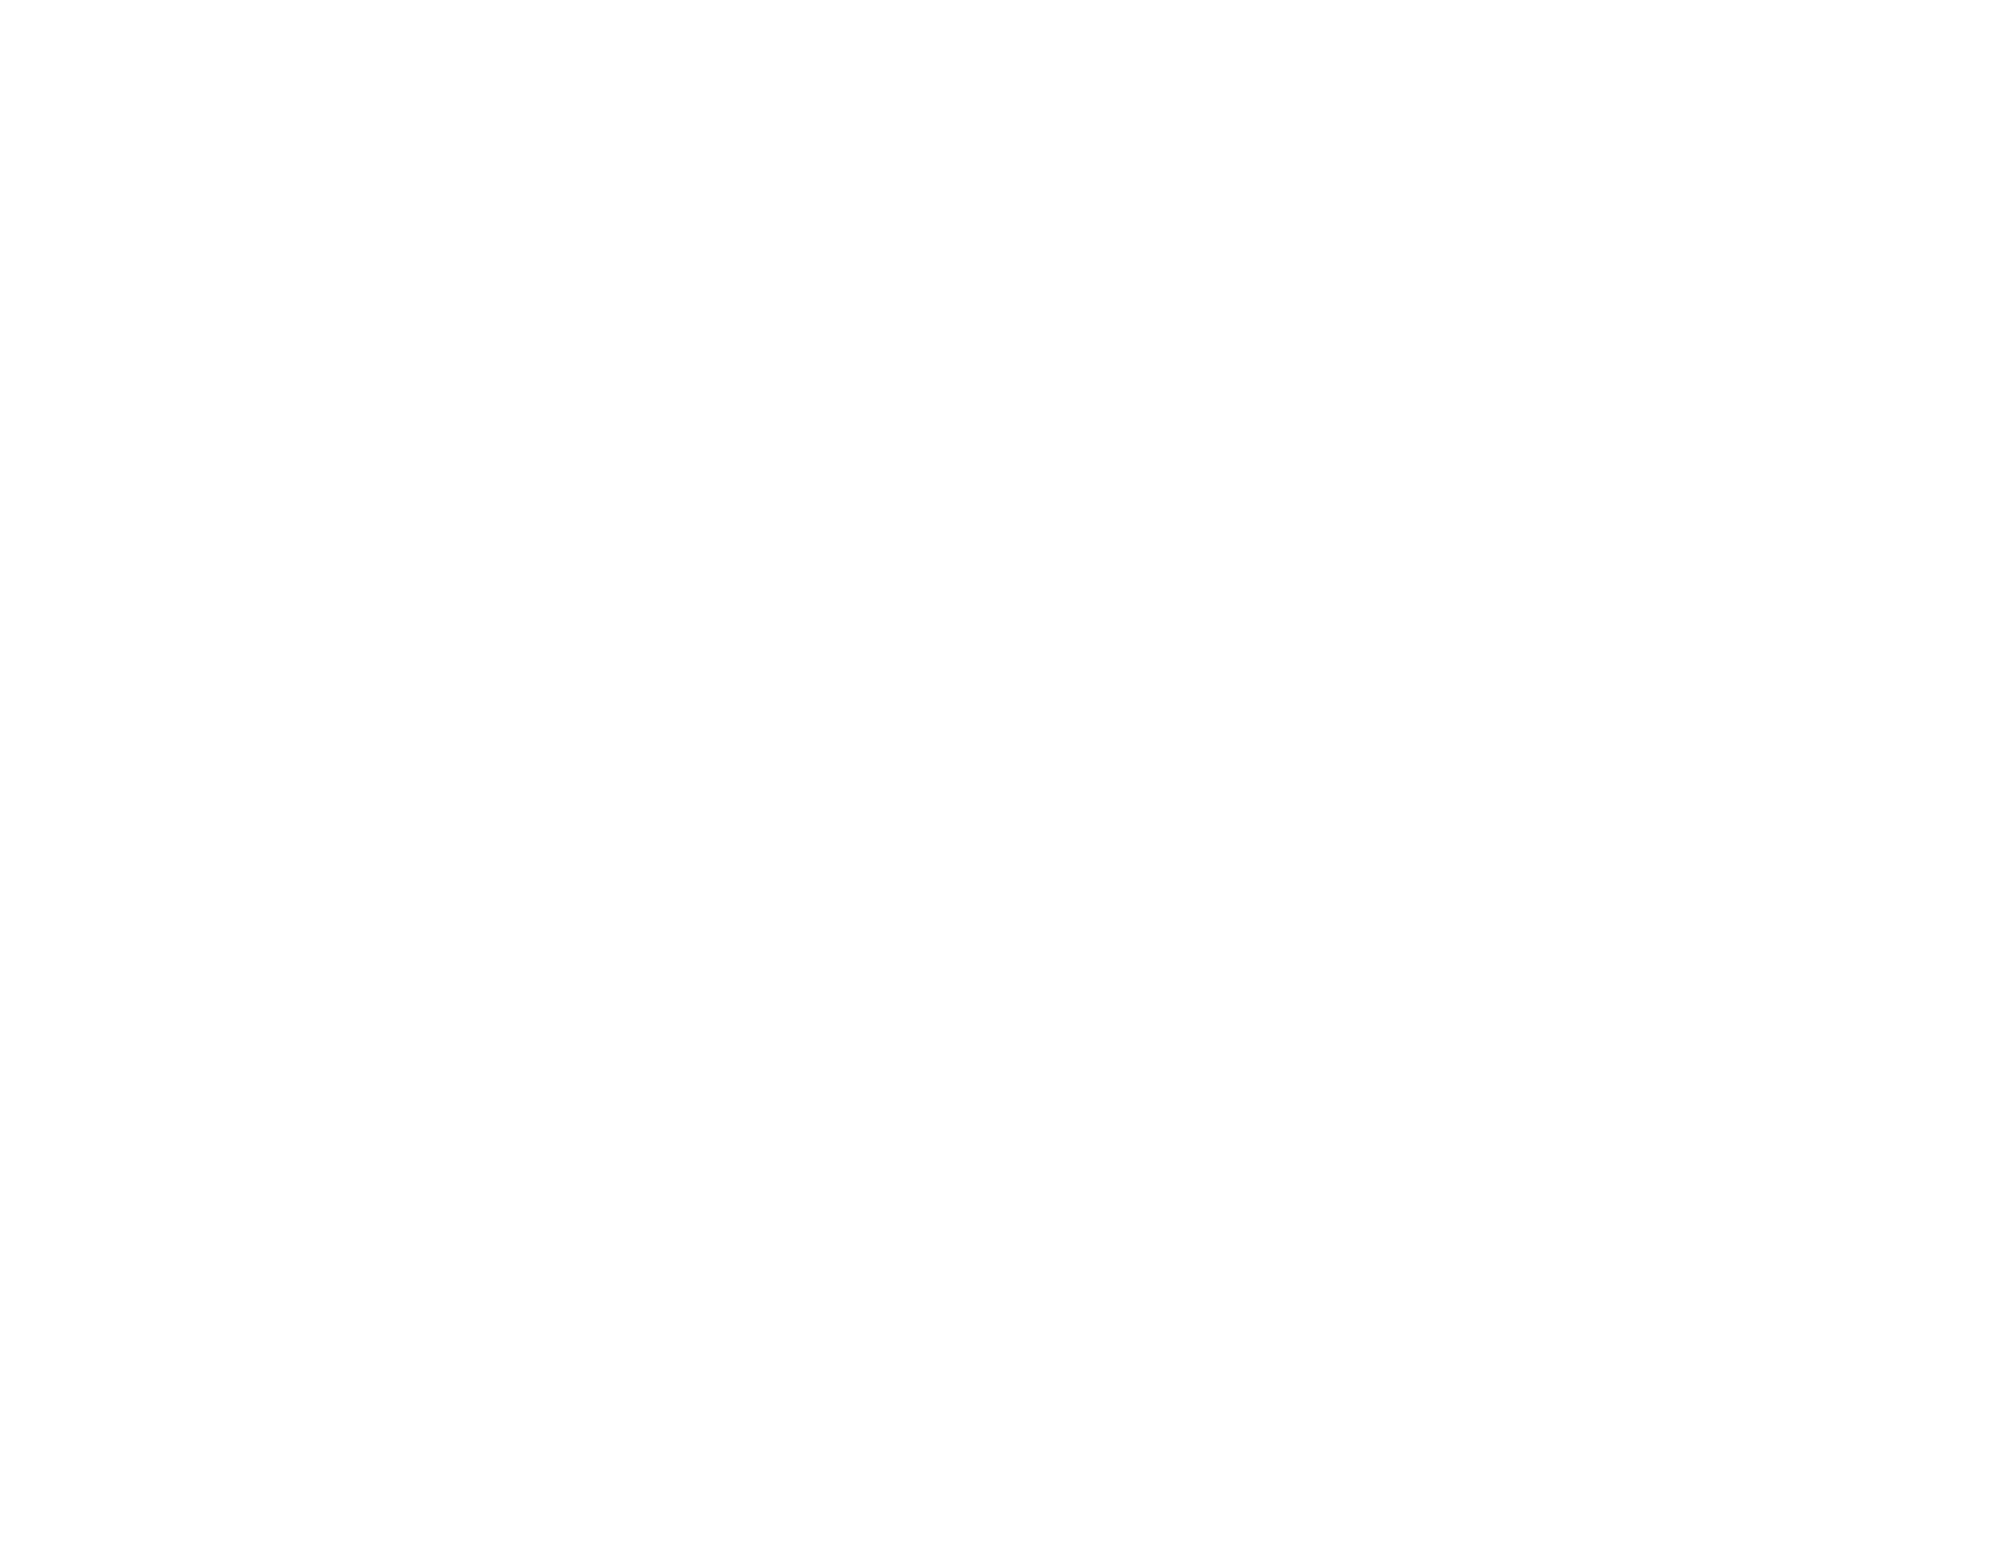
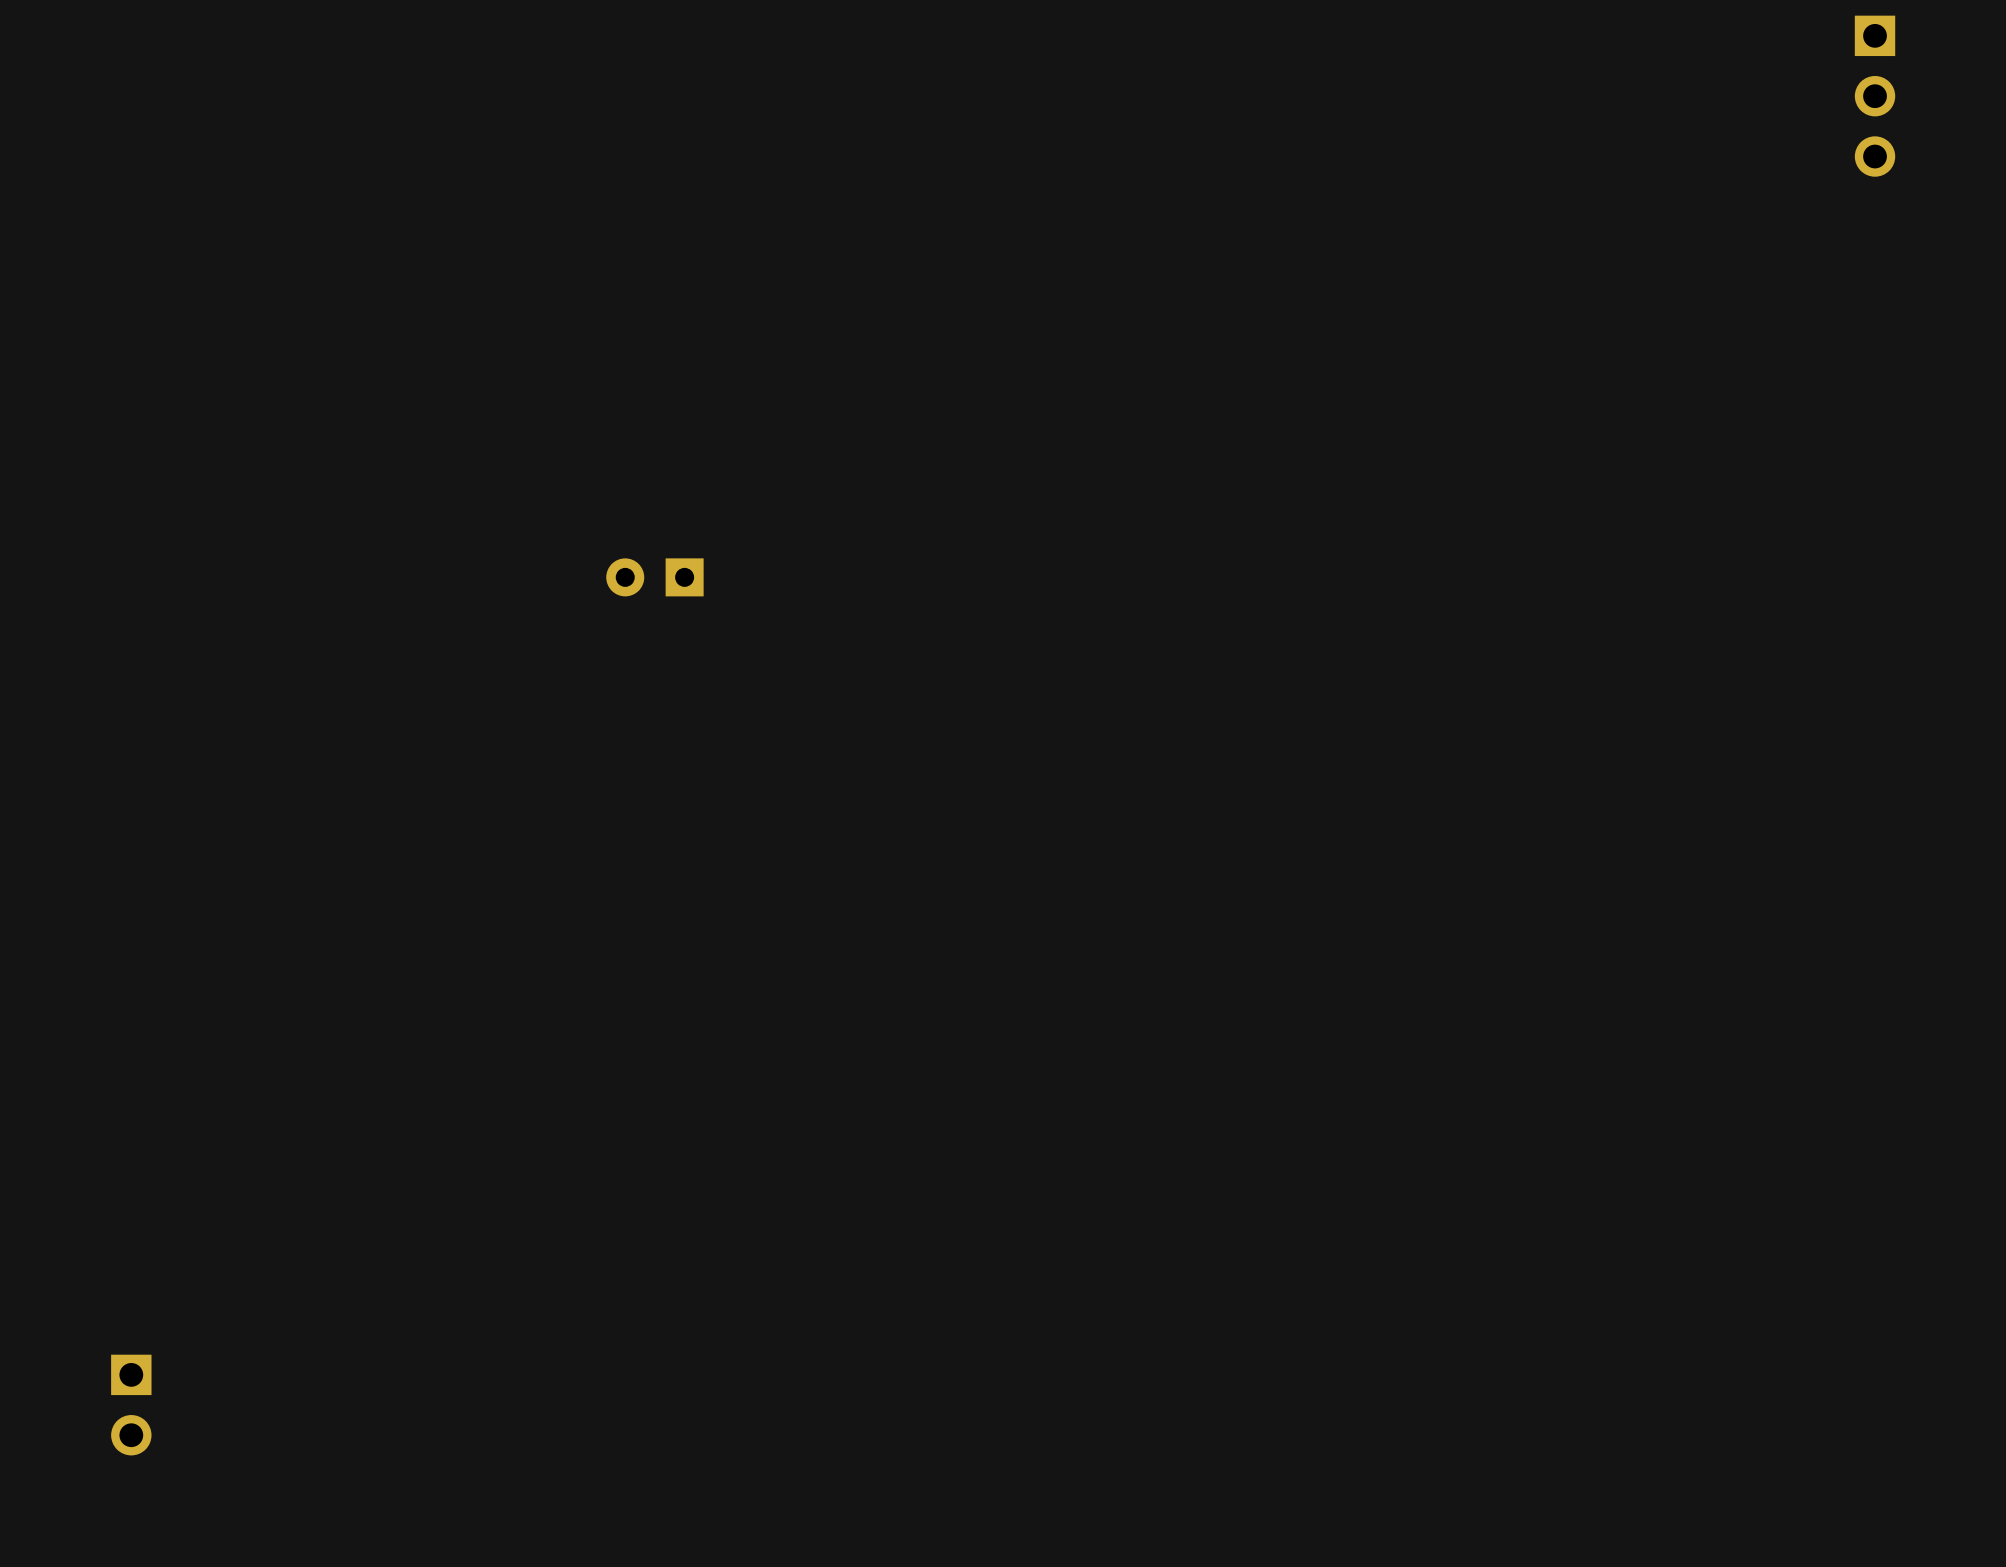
part: none -> (1875, 96)
part: none -> (654, 577)
part: none -> (131, 1405)

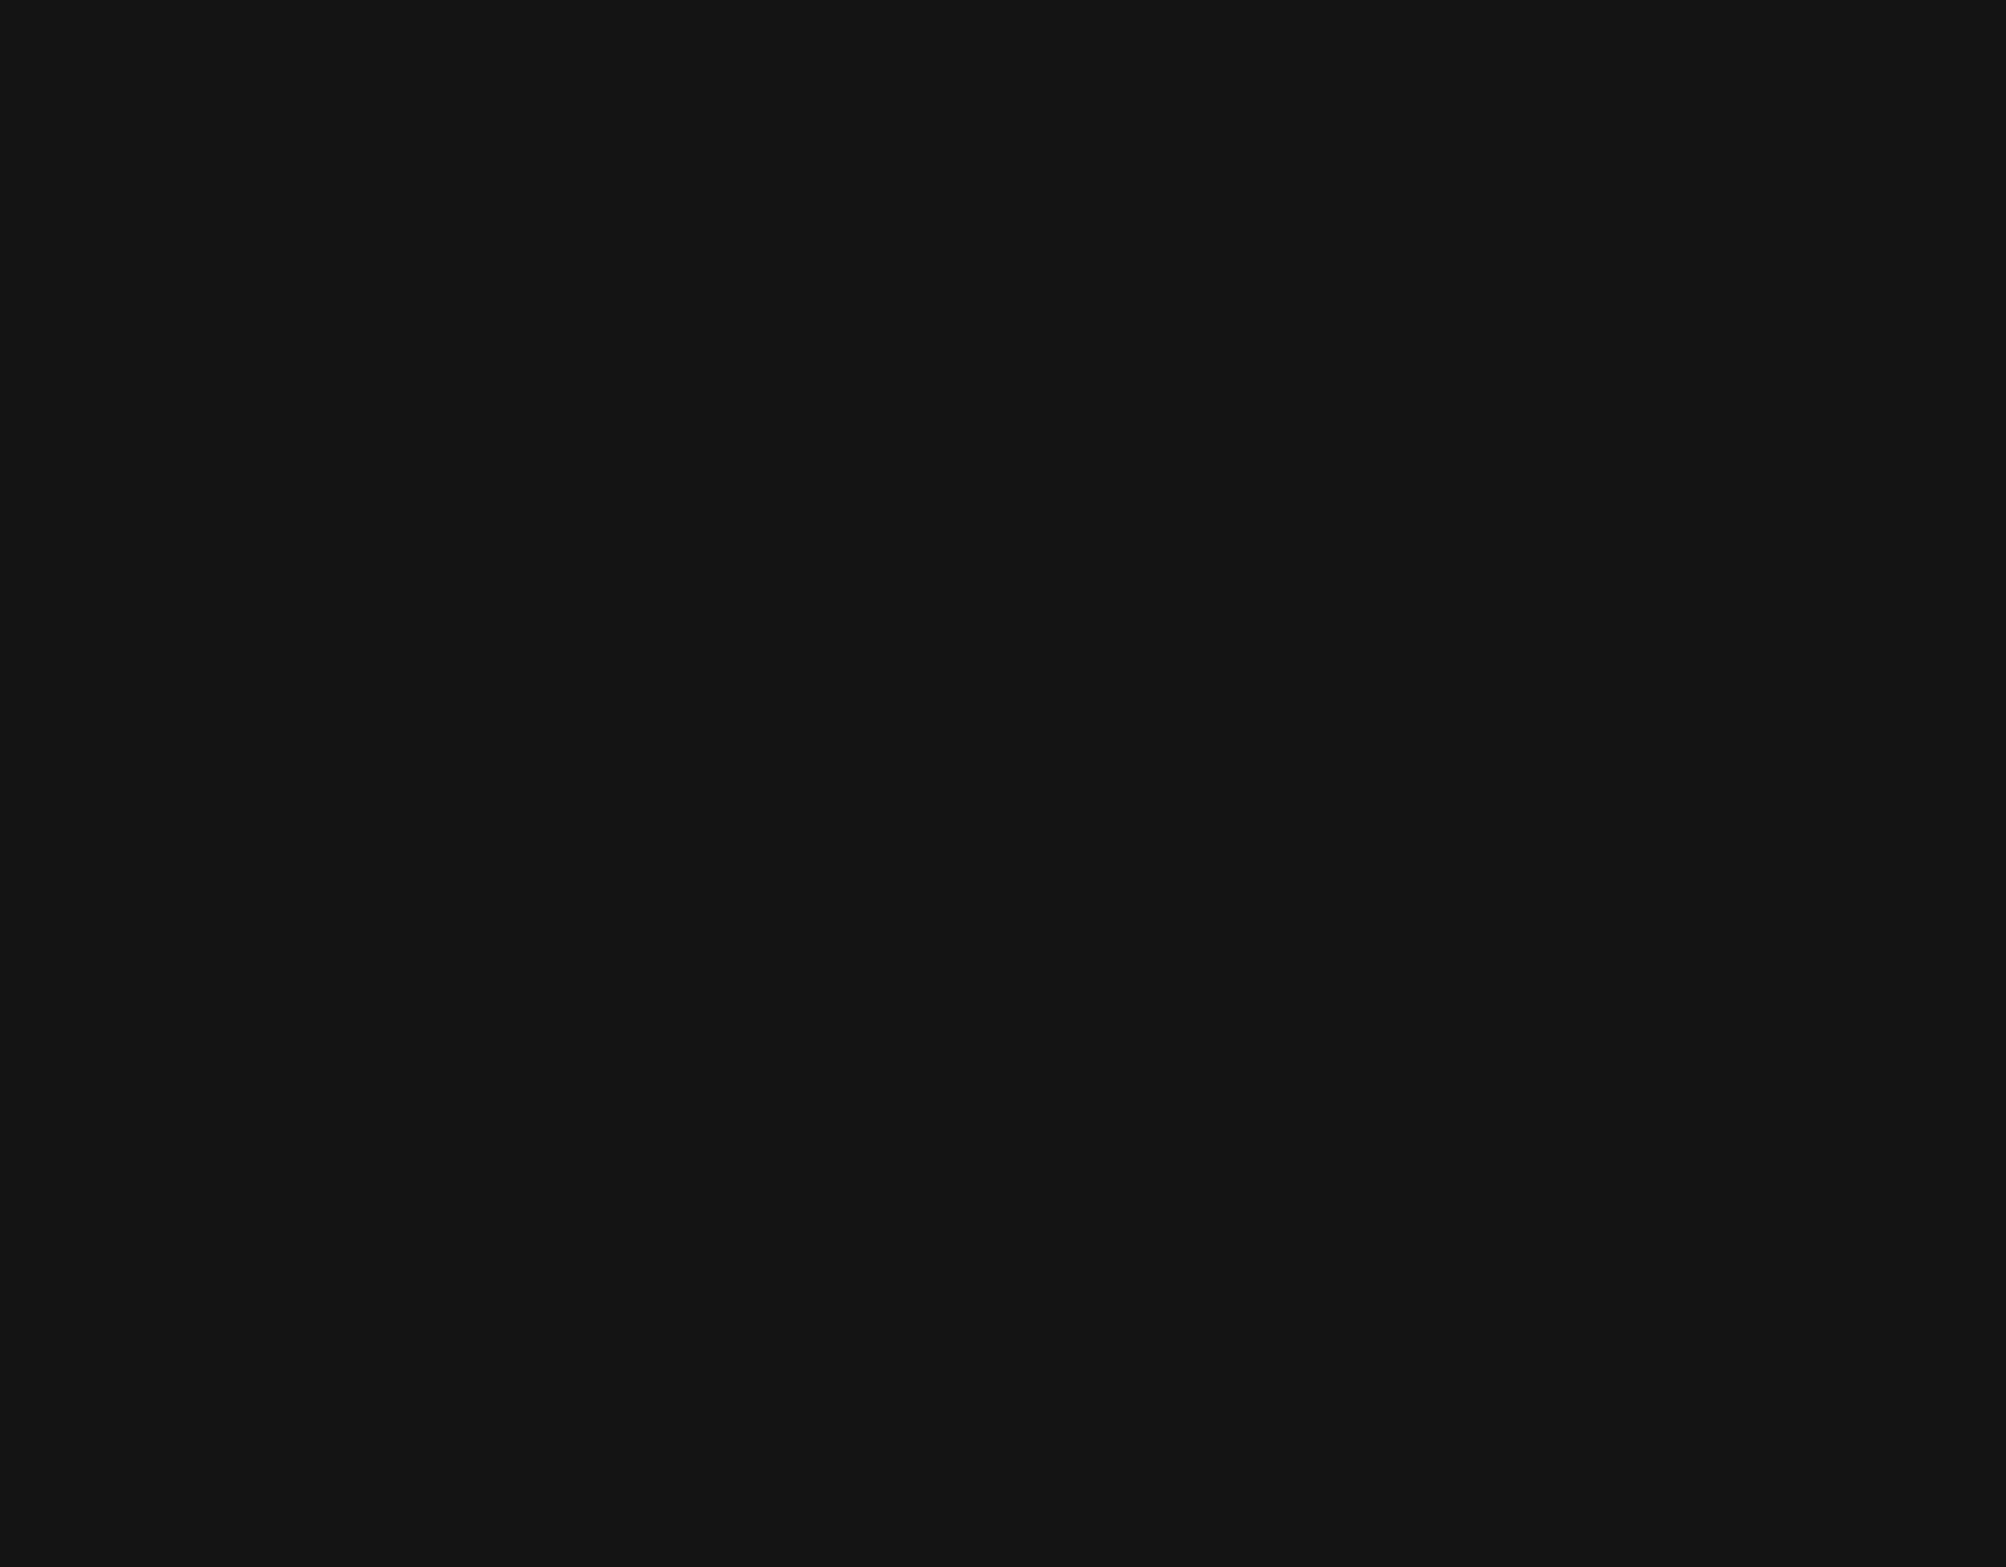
part: (1875, 96) -> none
part: (654, 577) -> none
part: (131, 1405) -> none

